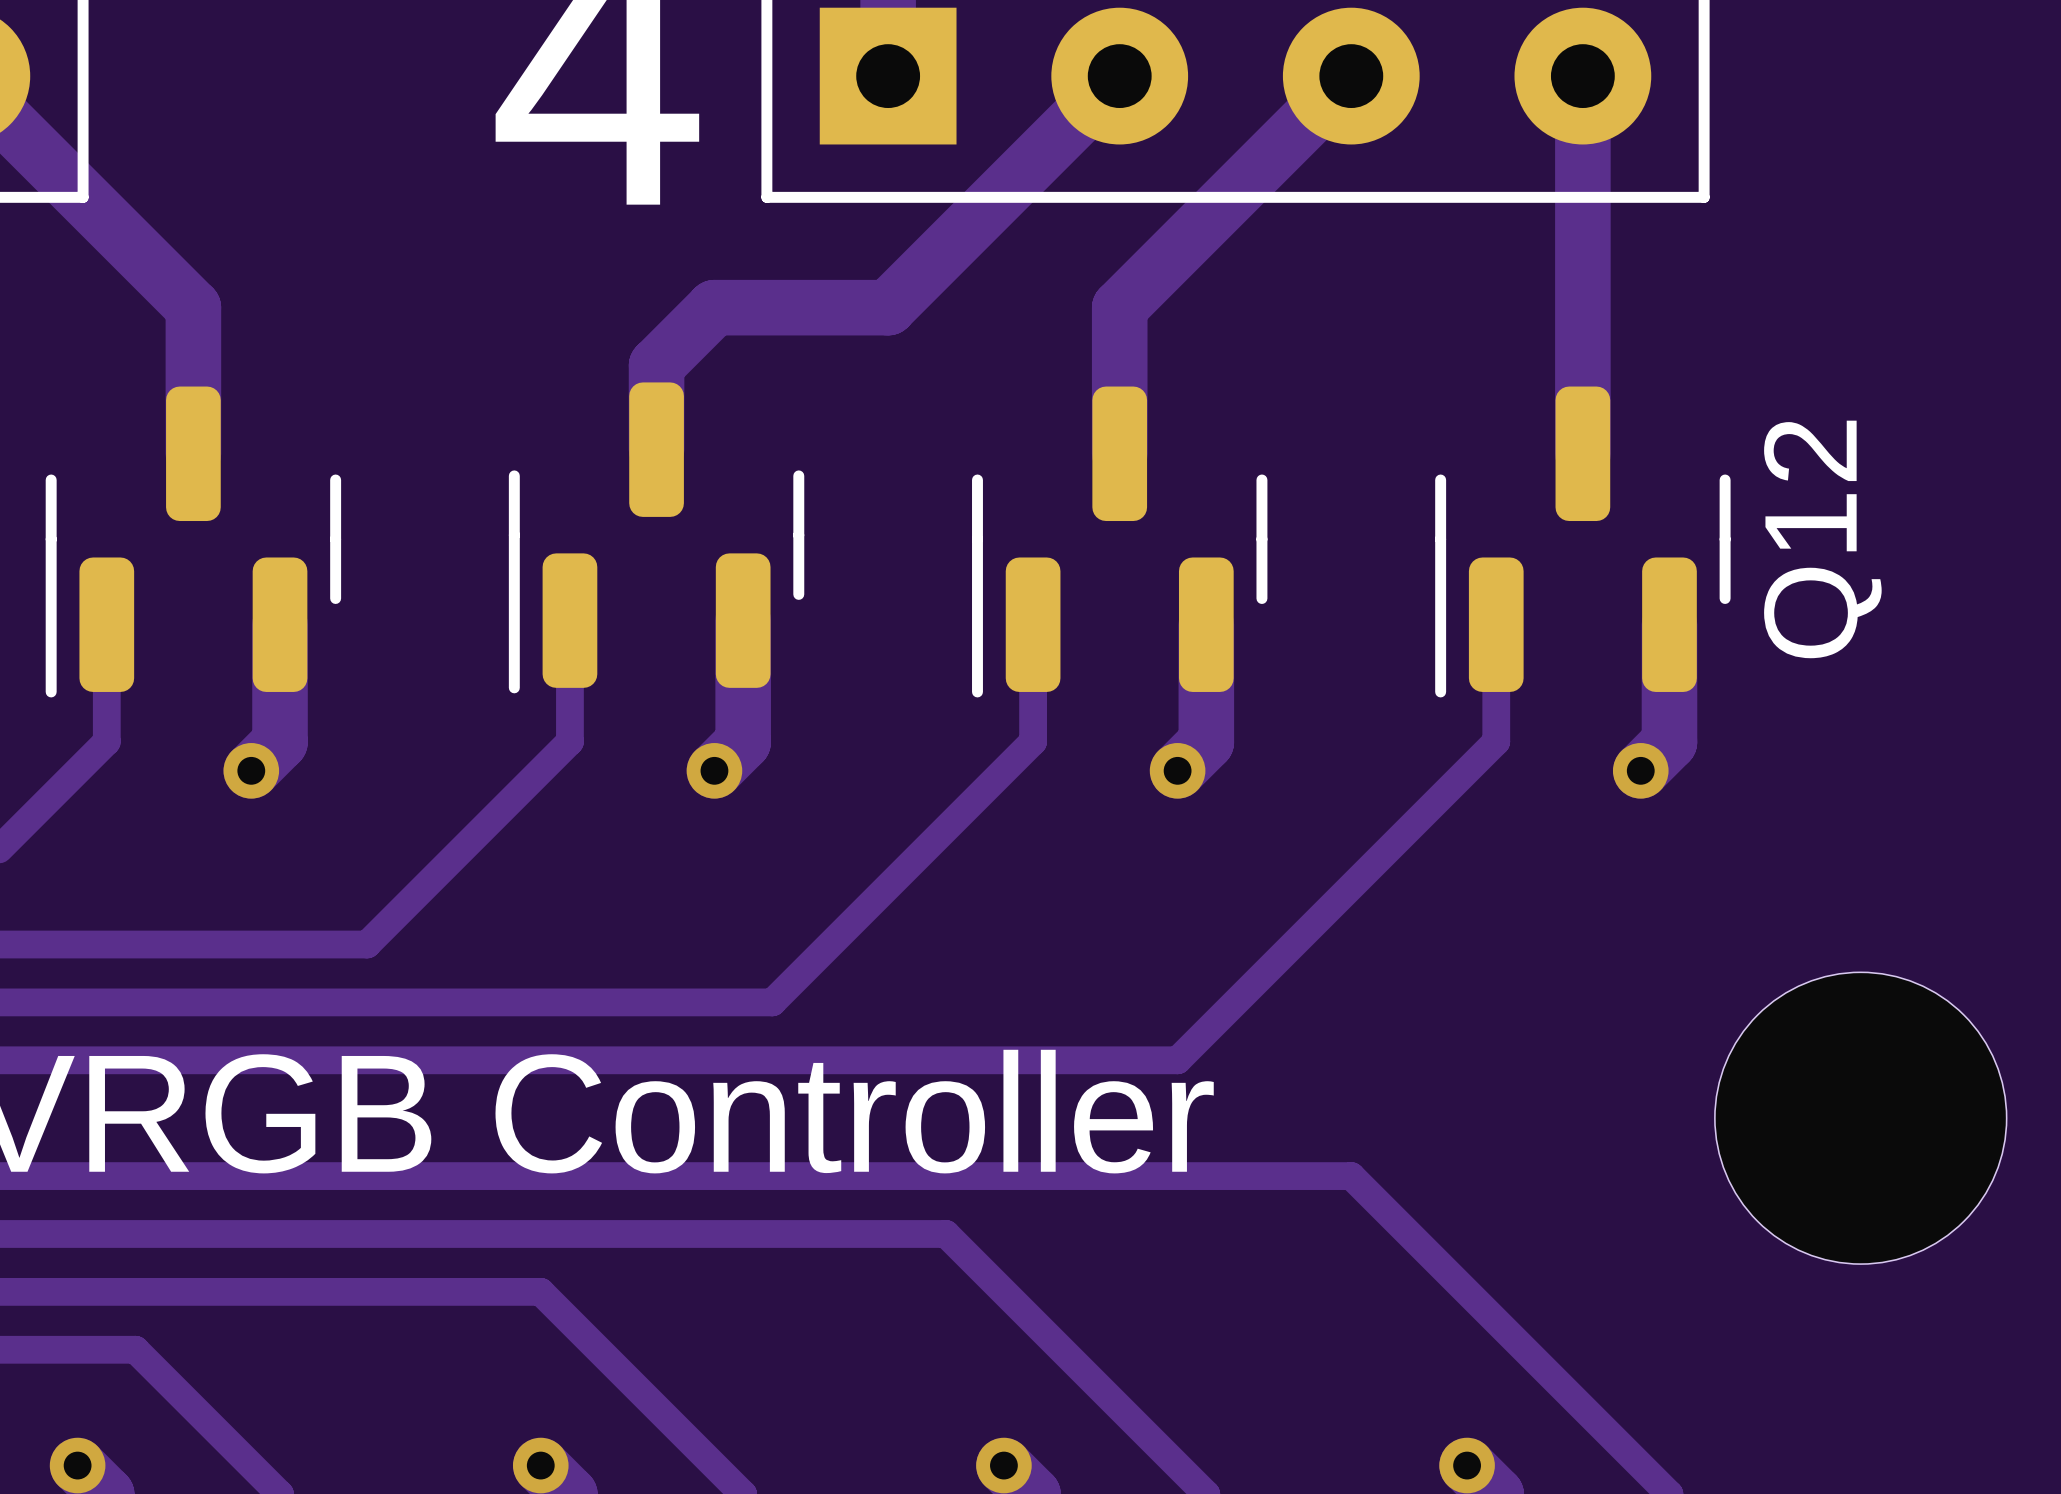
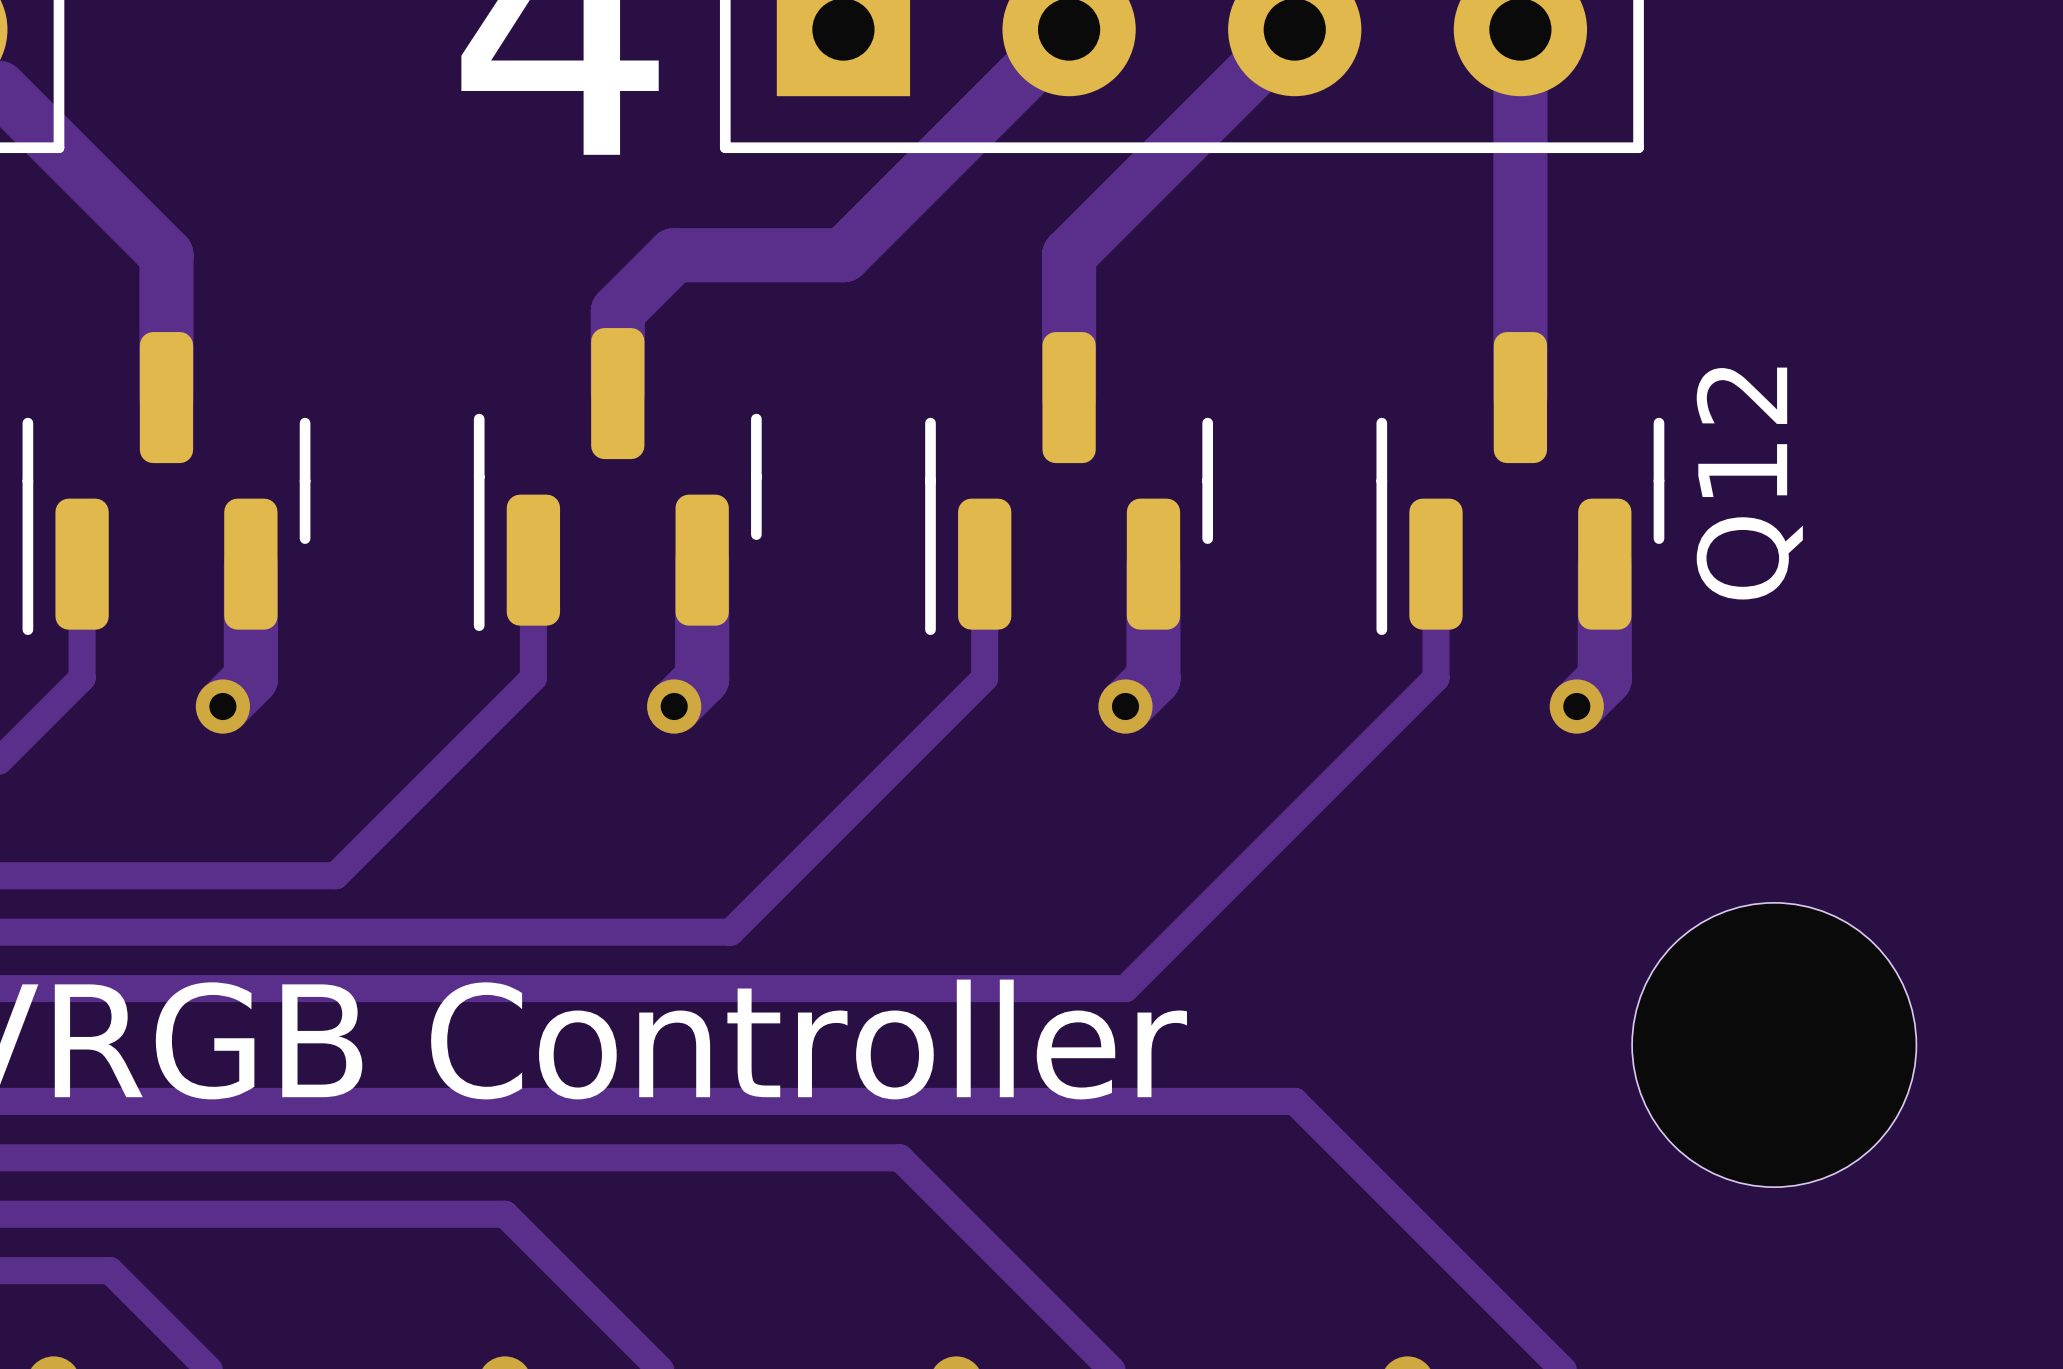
part position: (1860, 1118) -> (1774, 1044)

